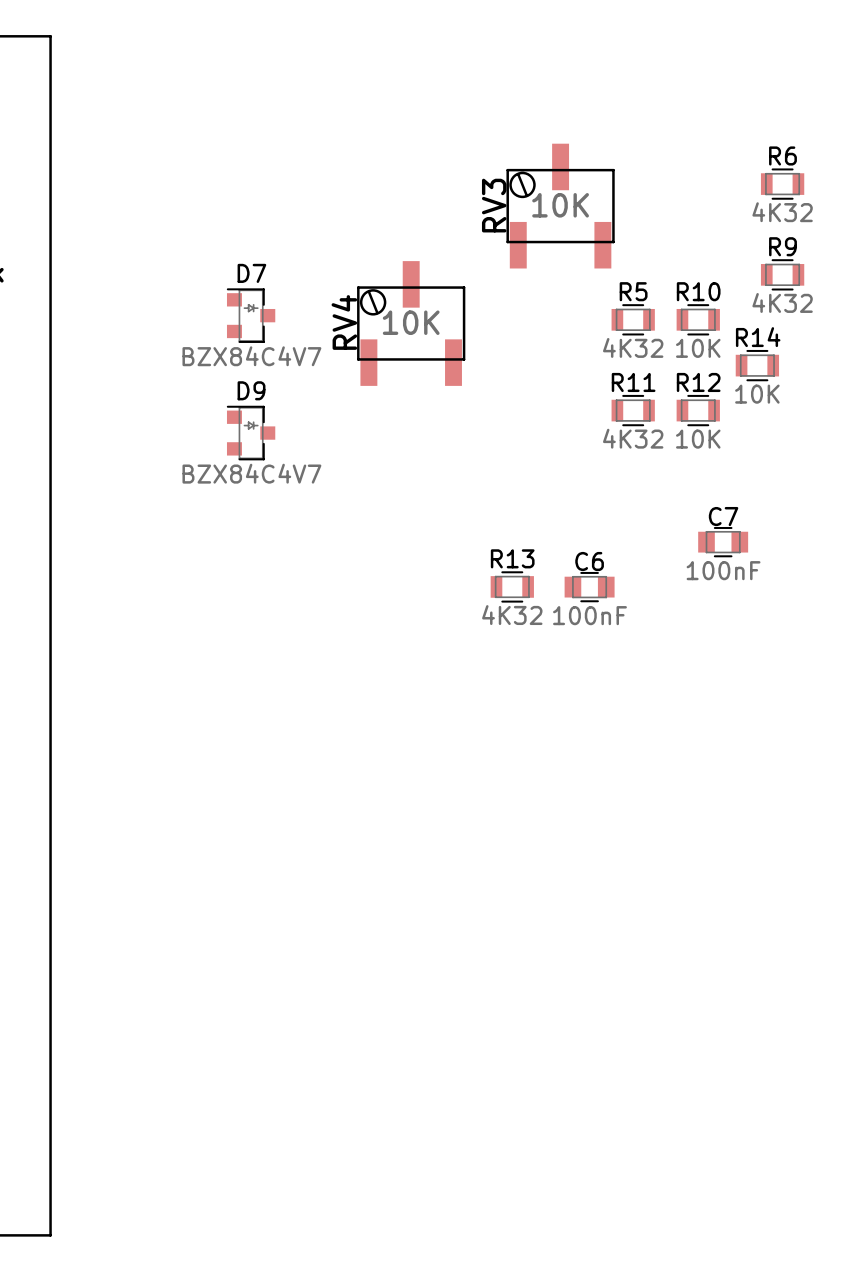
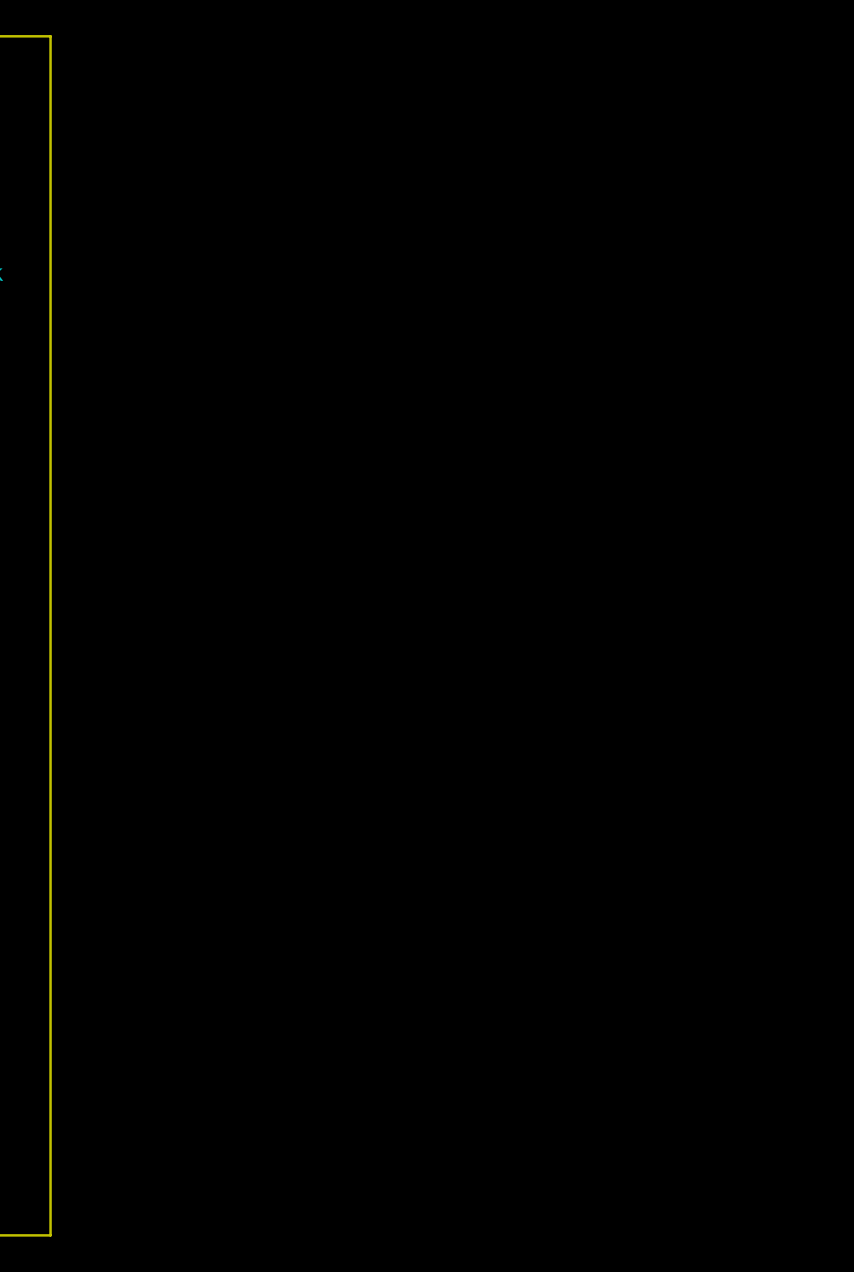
R6: 4K32 (782, 184) -> none
RV3: 10K (560, 206) -> none
R9: 4K32 (782, 274) -> none
D7: BZX84C4V7 (251, 315) -> none
R5: 4K32 (633, 319) -> none
R10: 10K (698, 319) -> none
RV4: 10K (411, 323) -> none
R14: 10K (757, 365) -> none
R11: 4K32 (633, 410) -> none
R12: 10K (698, 410) -> none
D9: BZX84C4V7 (251, 433) -> none
C7: 100nF (723, 542) -> none
R13: 4K32 (512, 586) -> none
C6: 100nF (589, 587) -> none

